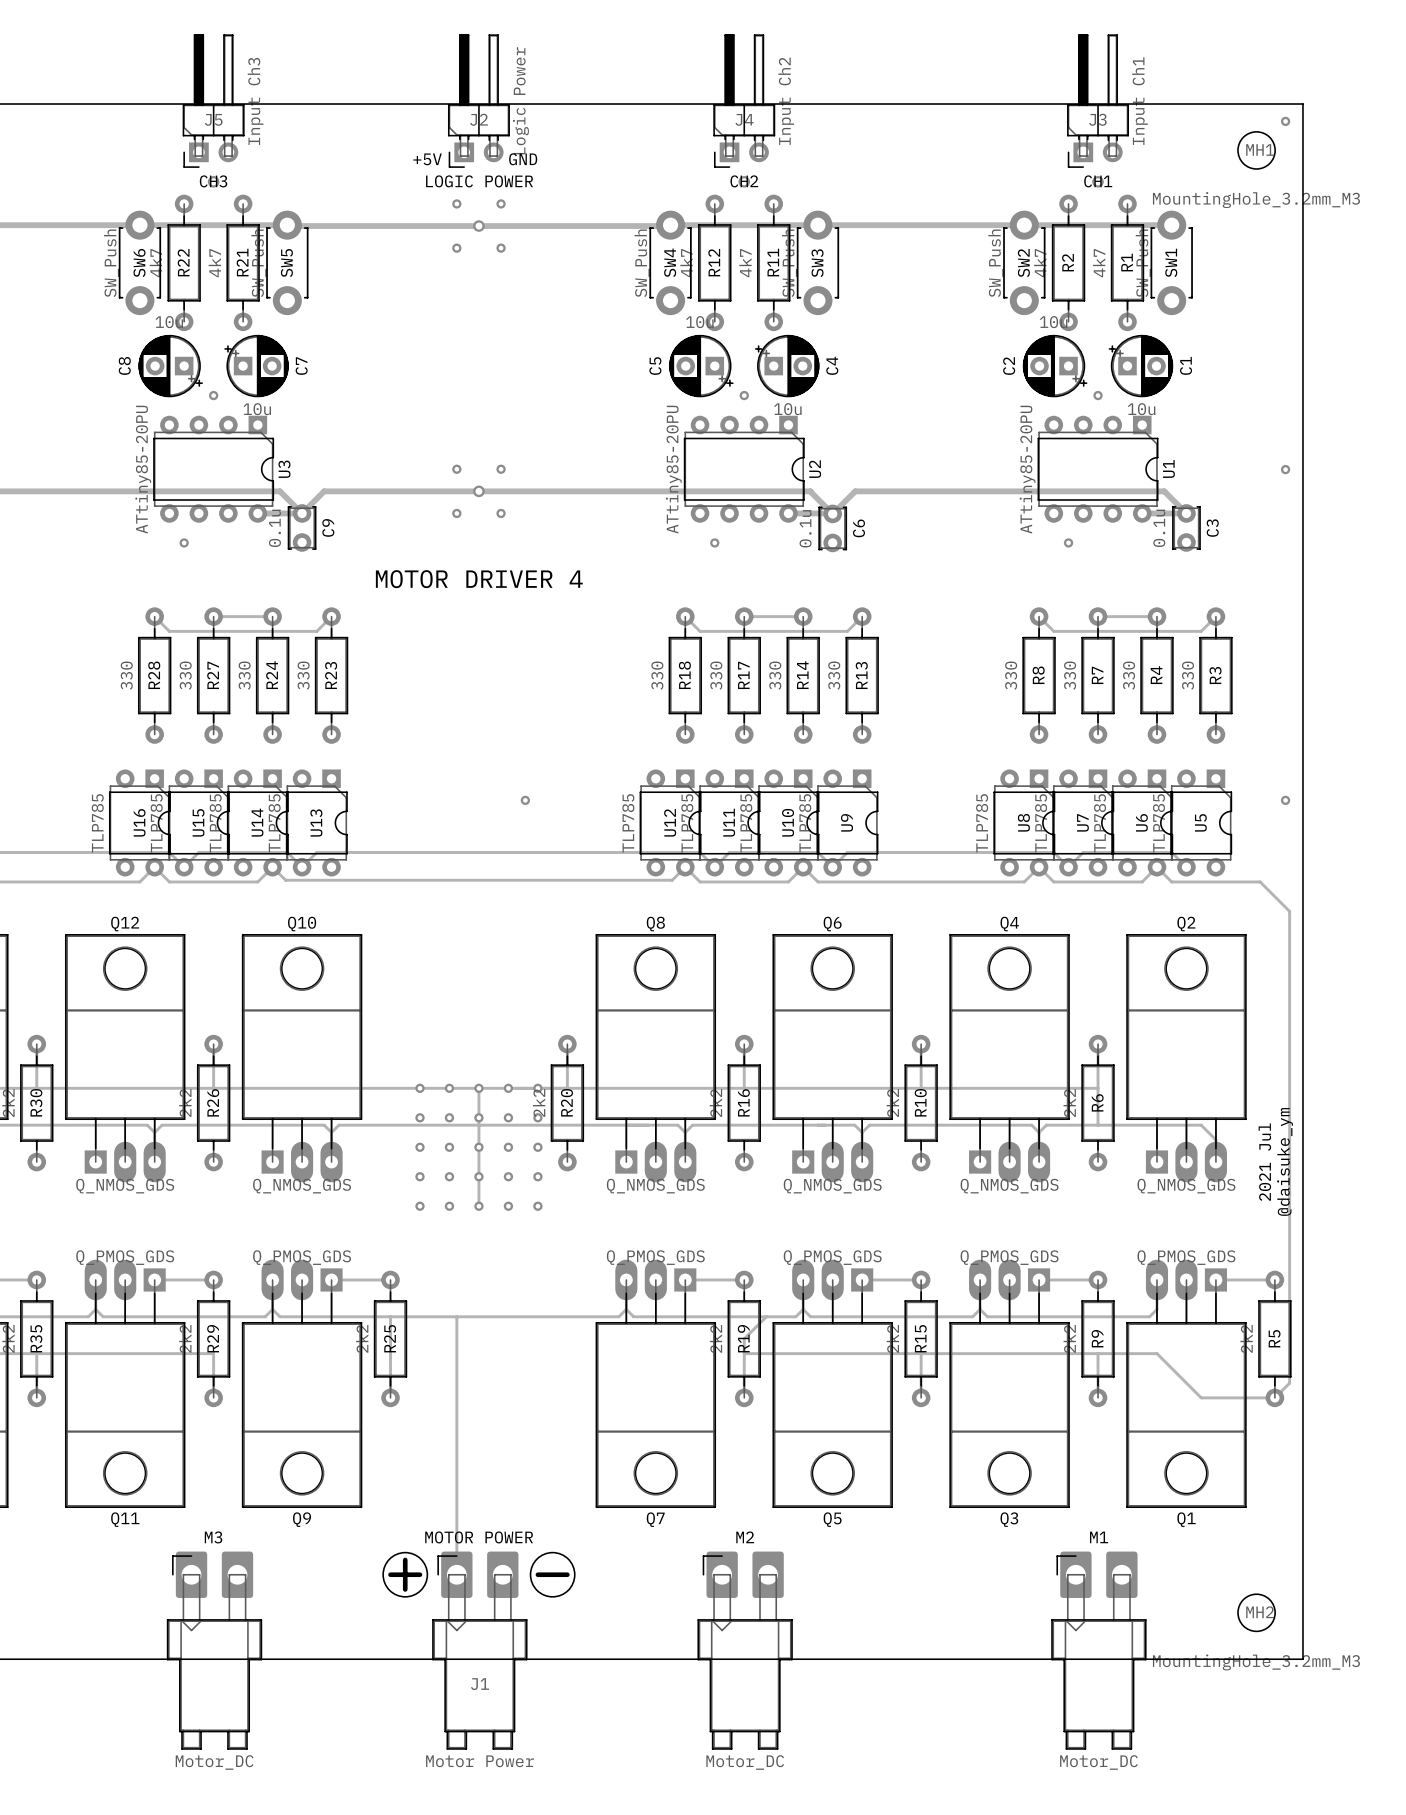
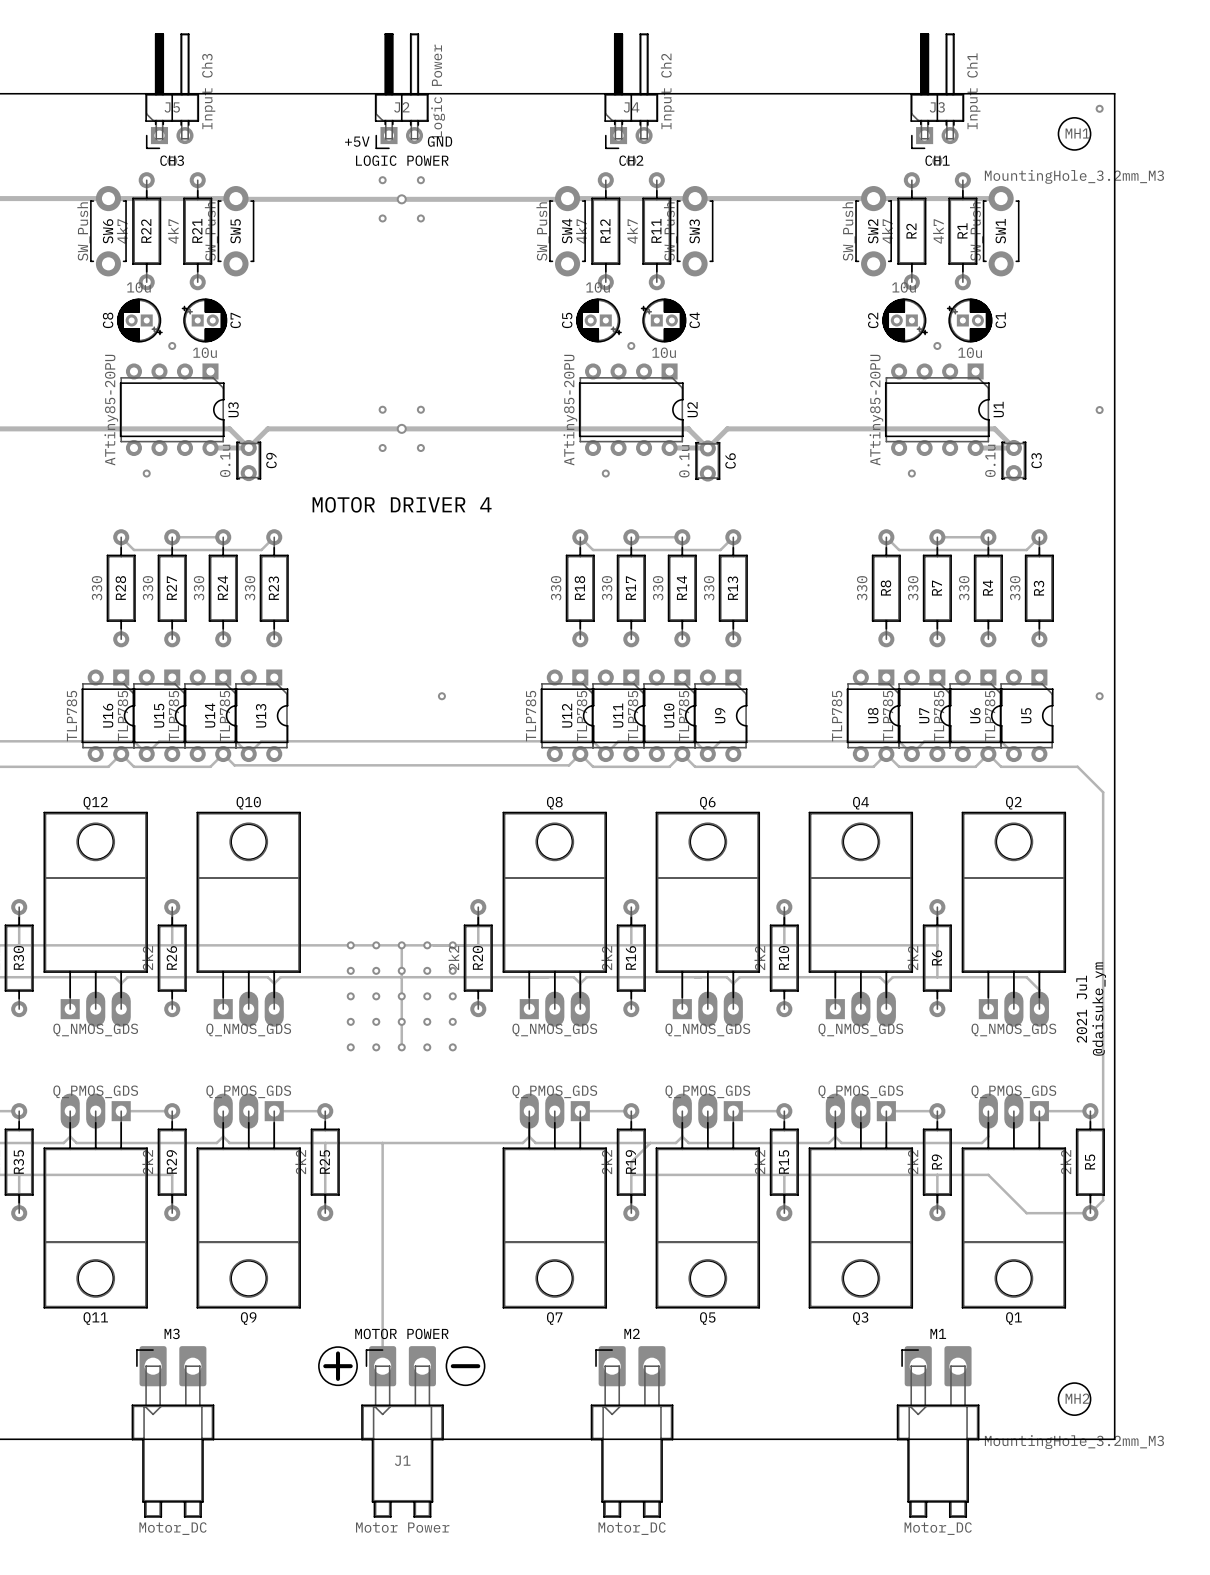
C8 footprint: [138, 334, 203, 398] -> [117, 298, 163, 343]
C7 footprint: [224, 334, 289, 398] -> [181, 298, 228, 343]
C5 footprint: [669, 334, 734, 398] -> [576, 298, 622, 343]
C4 footprint: [755, 334, 820, 398] -> [640, 298, 687, 343]
C2 footprint: [1022, 334, 1088, 398] -> [882, 298, 928, 343]
C1 footprint: [1108, 334, 1174, 398] -> [947, 298, 993, 343]

